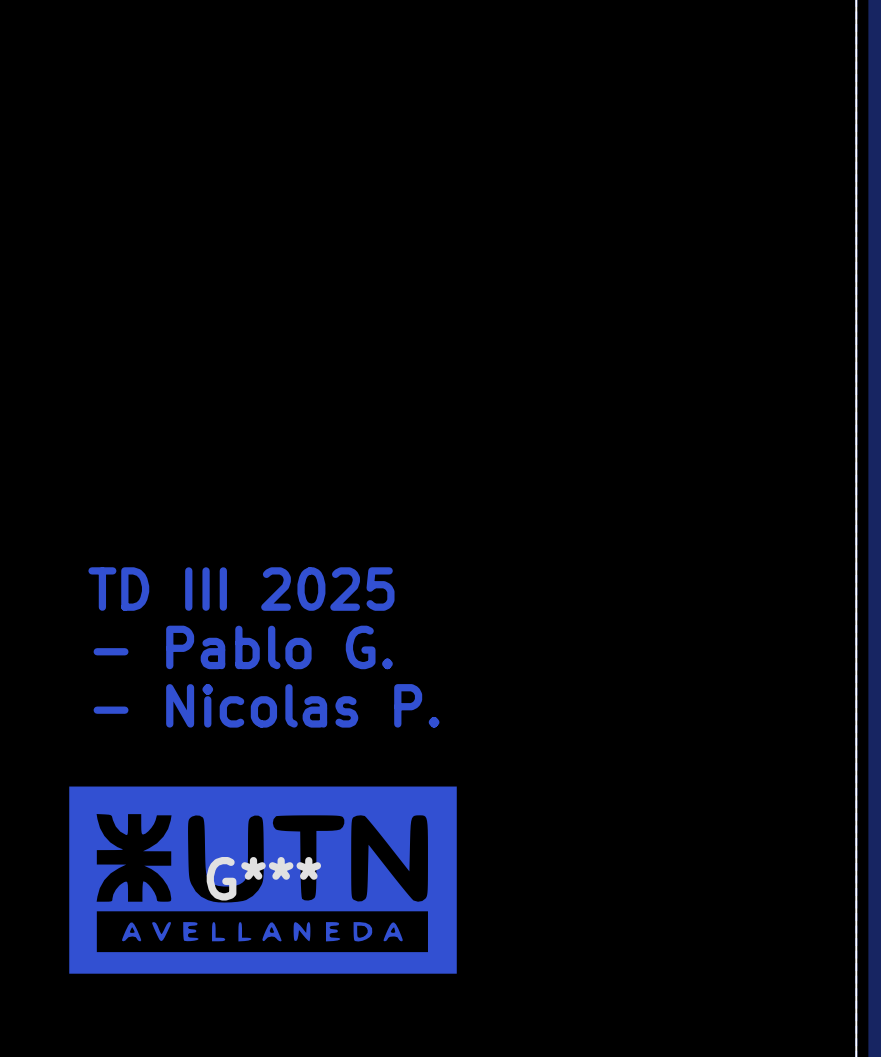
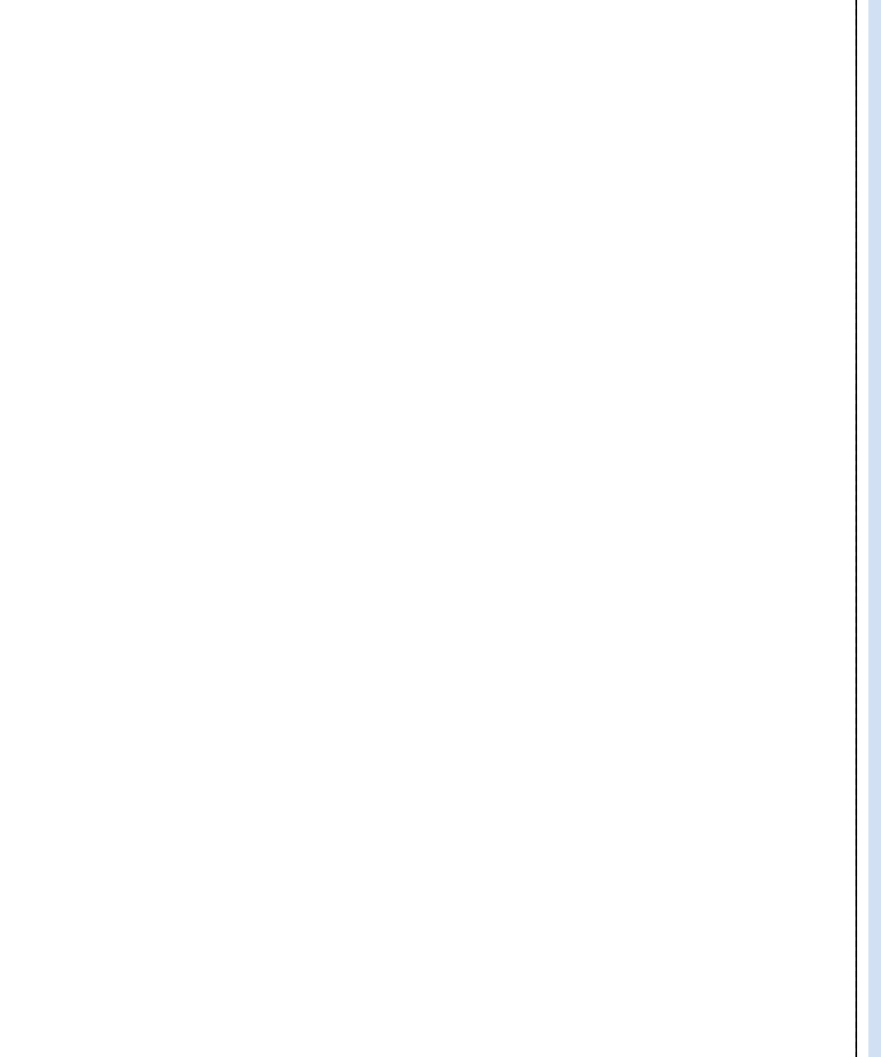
text: TD III 2025 (241, 589) -> none
text: - Pablo G. (243, 647) -> none
text: - Nicolas P. (266, 705) -> none
G***: (263, 880) -> none

